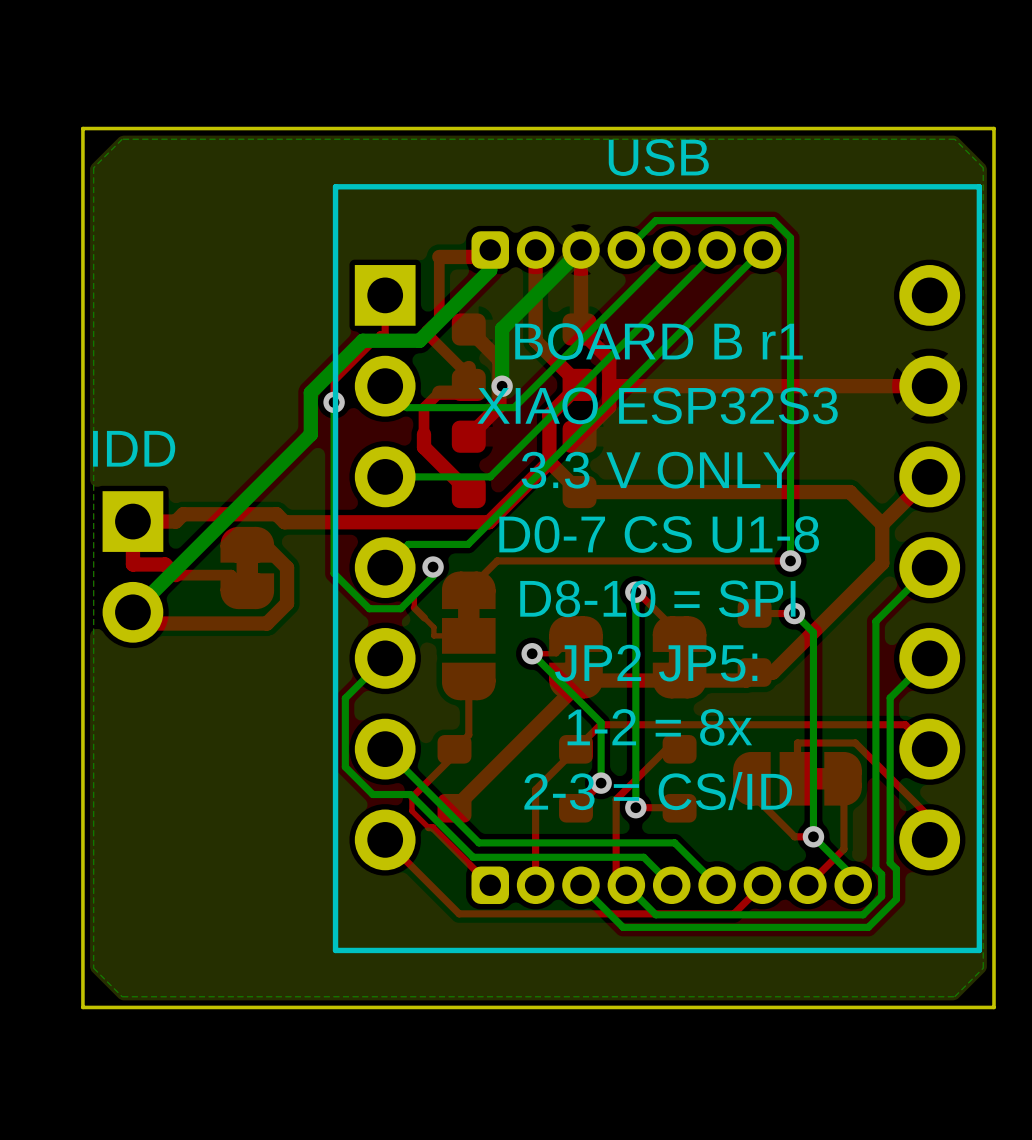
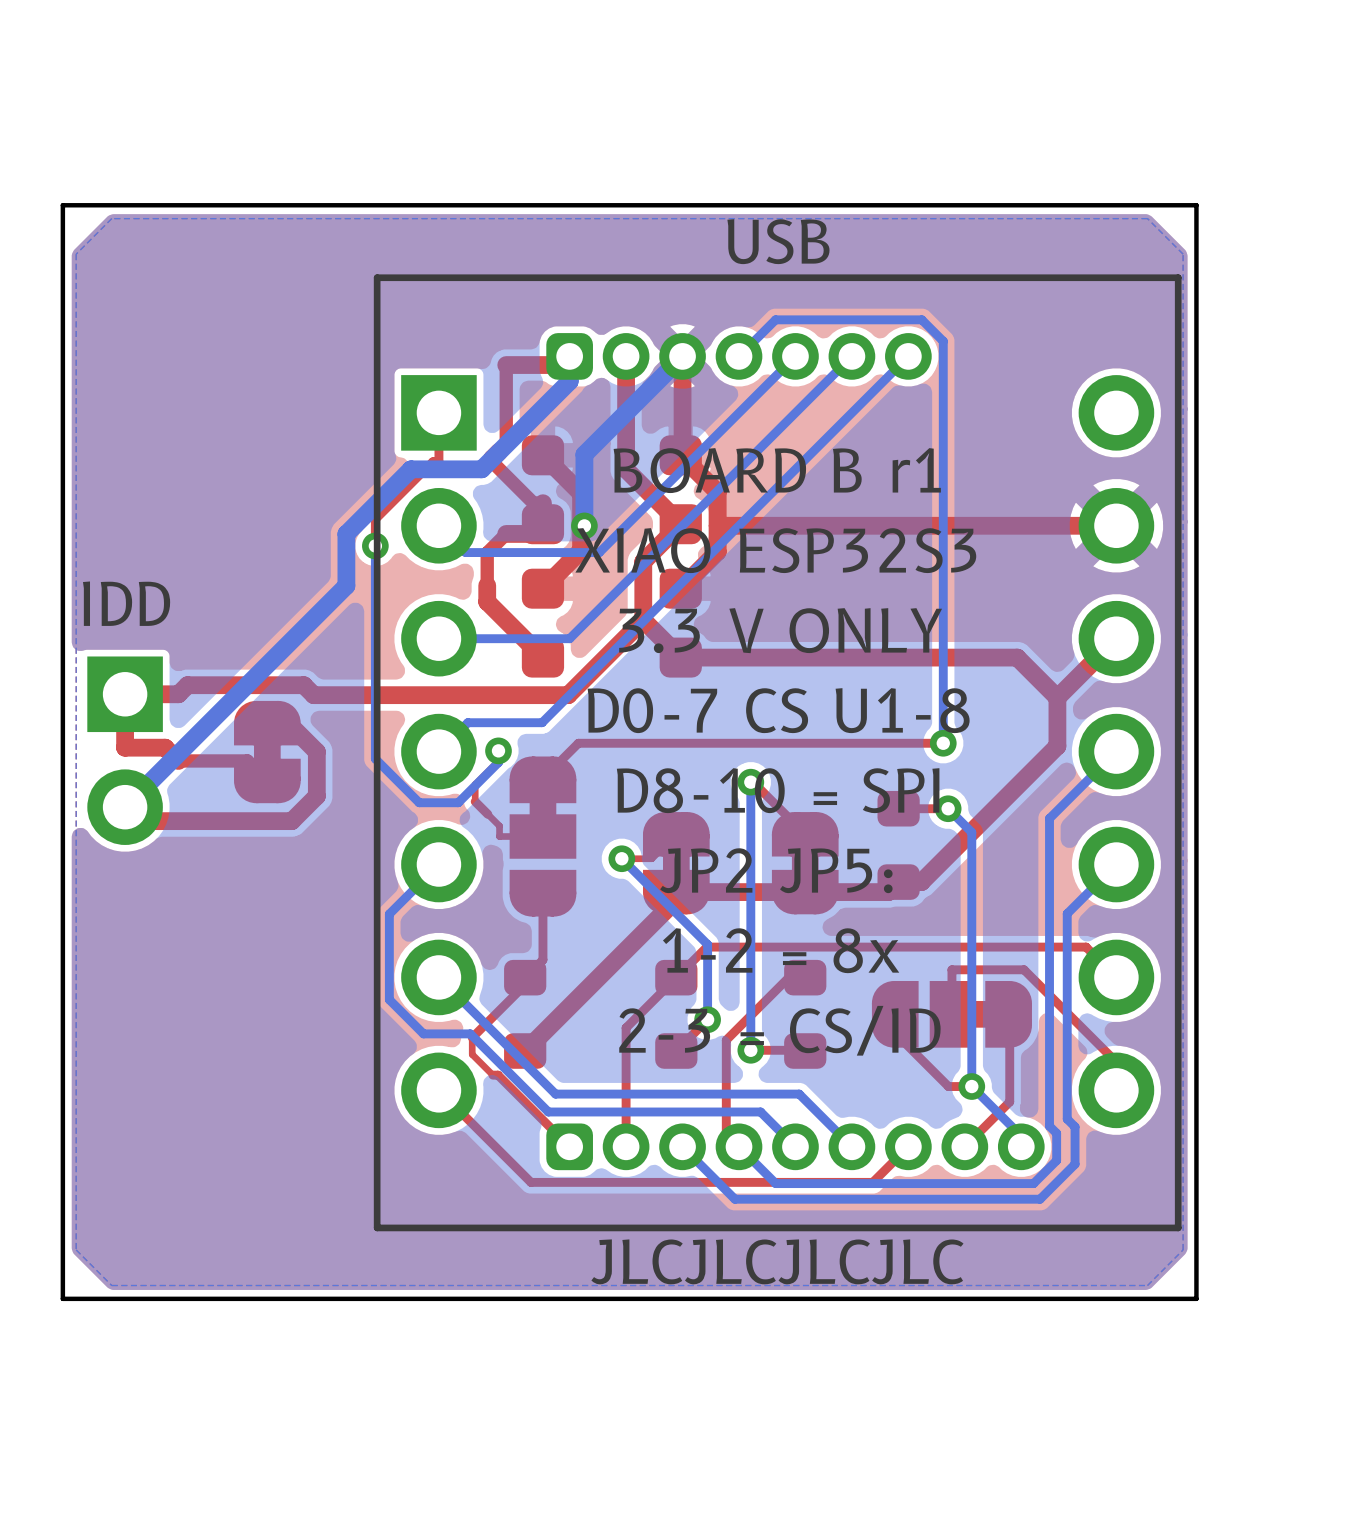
text: none -> JLCJLCJLCJLC (777, 1261)

